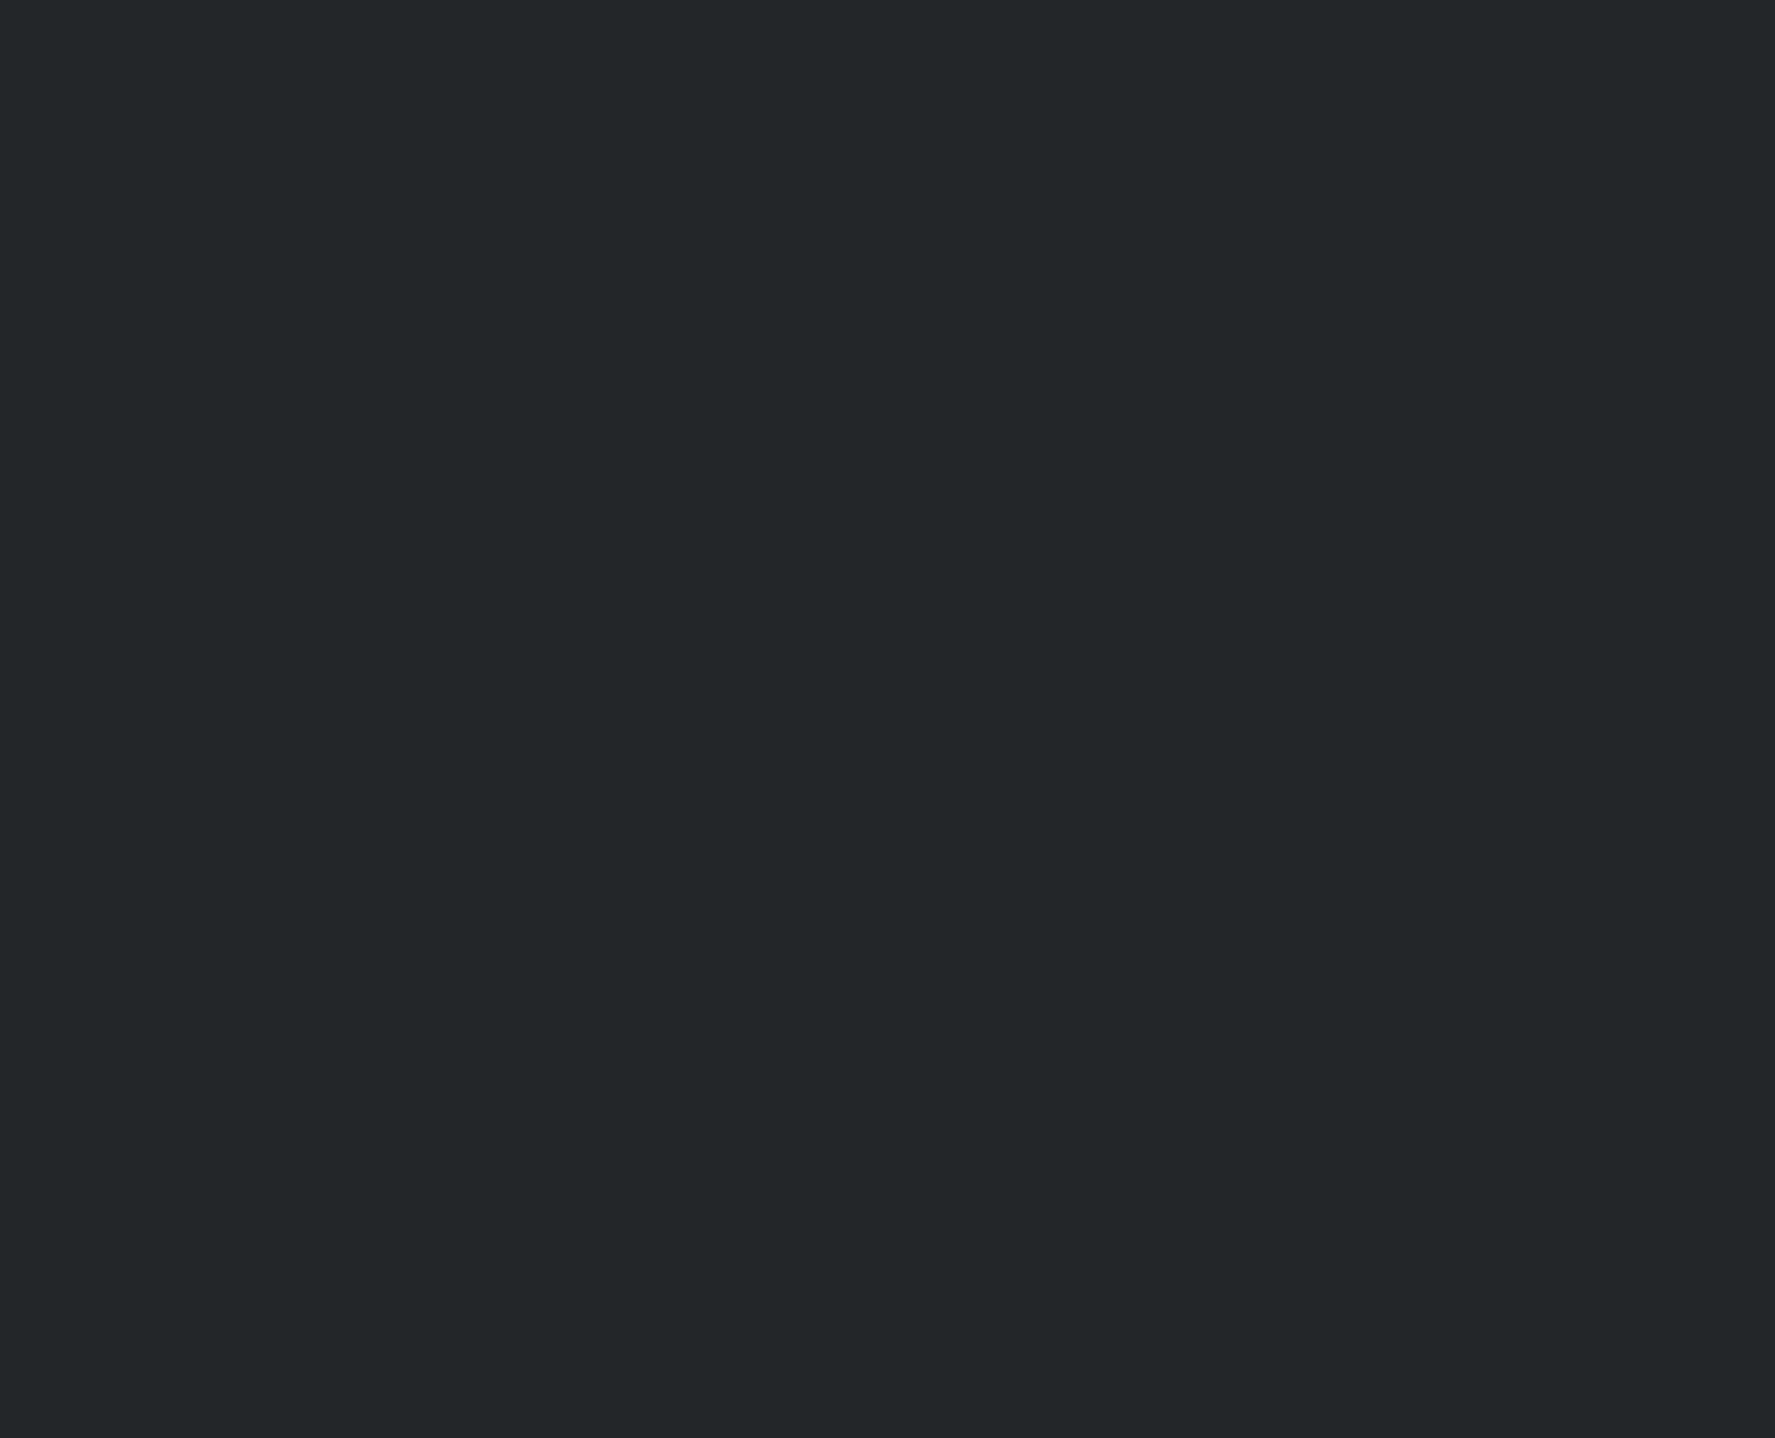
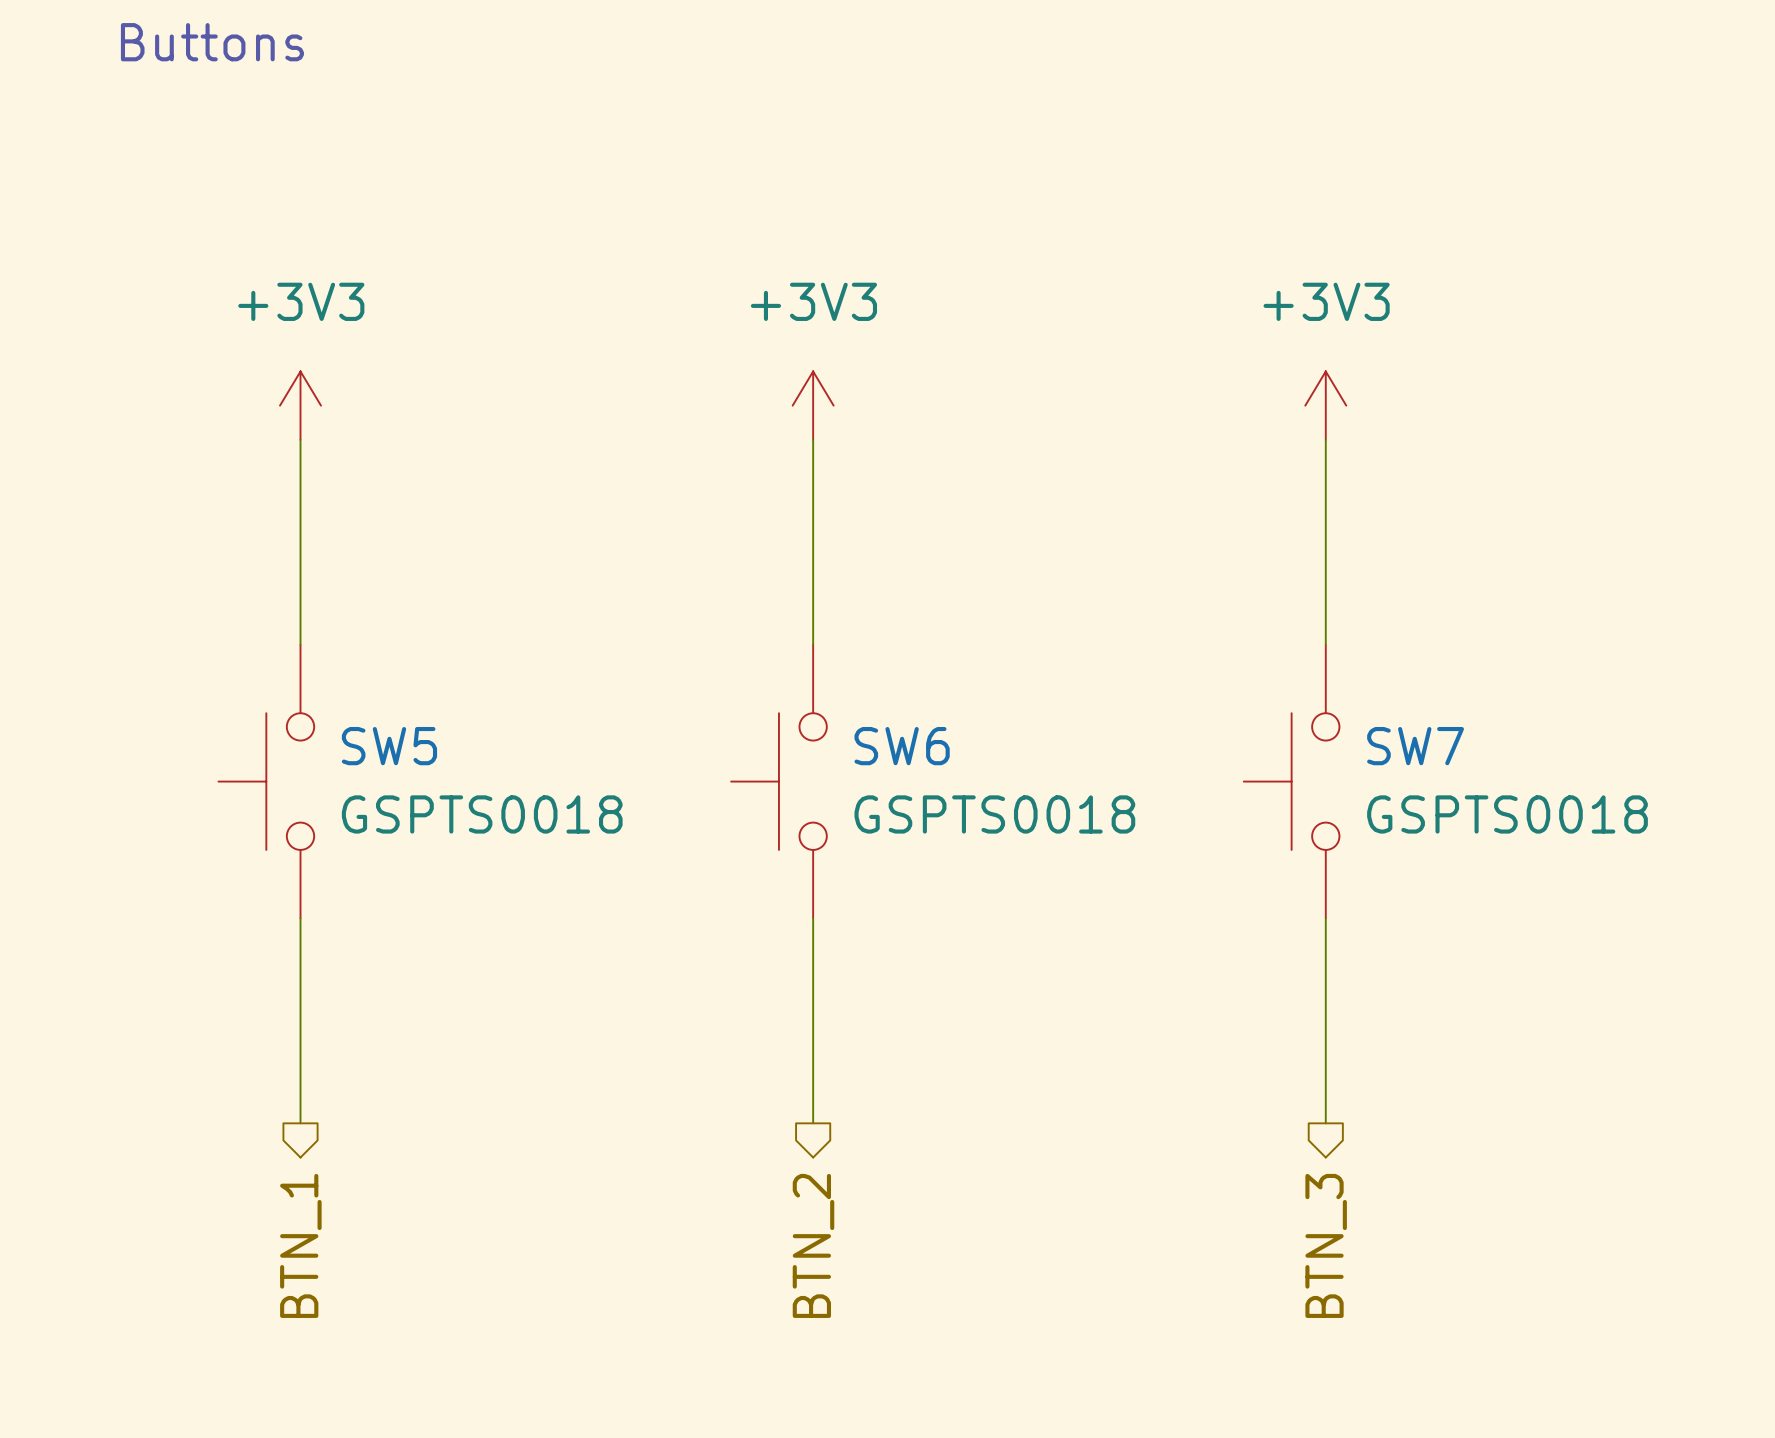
text: none -> Buttons (212, 42)
power symbol: none -> +3V3 (300, 405)
power symbol: none -> +3V3 (813, 405)
power symbol: none -> +3V3 (1325, 405)
wire: none -> (300, 439) (300, 644)
wire: none -> (813, 439) (813, 644)
wire: none -> (1325, 439) (1325, 644)
SW5: none -> GSPTS0018 (266, 781)
SW6: none -> GSPTS0018 (778, 781)
SW7: none -> GSPTS0018 (1291, 781)
wire: none -> (300, 918) (300, 1123)
wire: none -> (813, 918) (813, 1123)
wire: none -> (1325, 918) (1325, 1123)
hierarchical label: none -> BTN_1 (300, 1245)
hierarchical label: none -> BTN_2 (813, 1245)
hierarchical label: none -> BTN_3 (1326, 1245)

